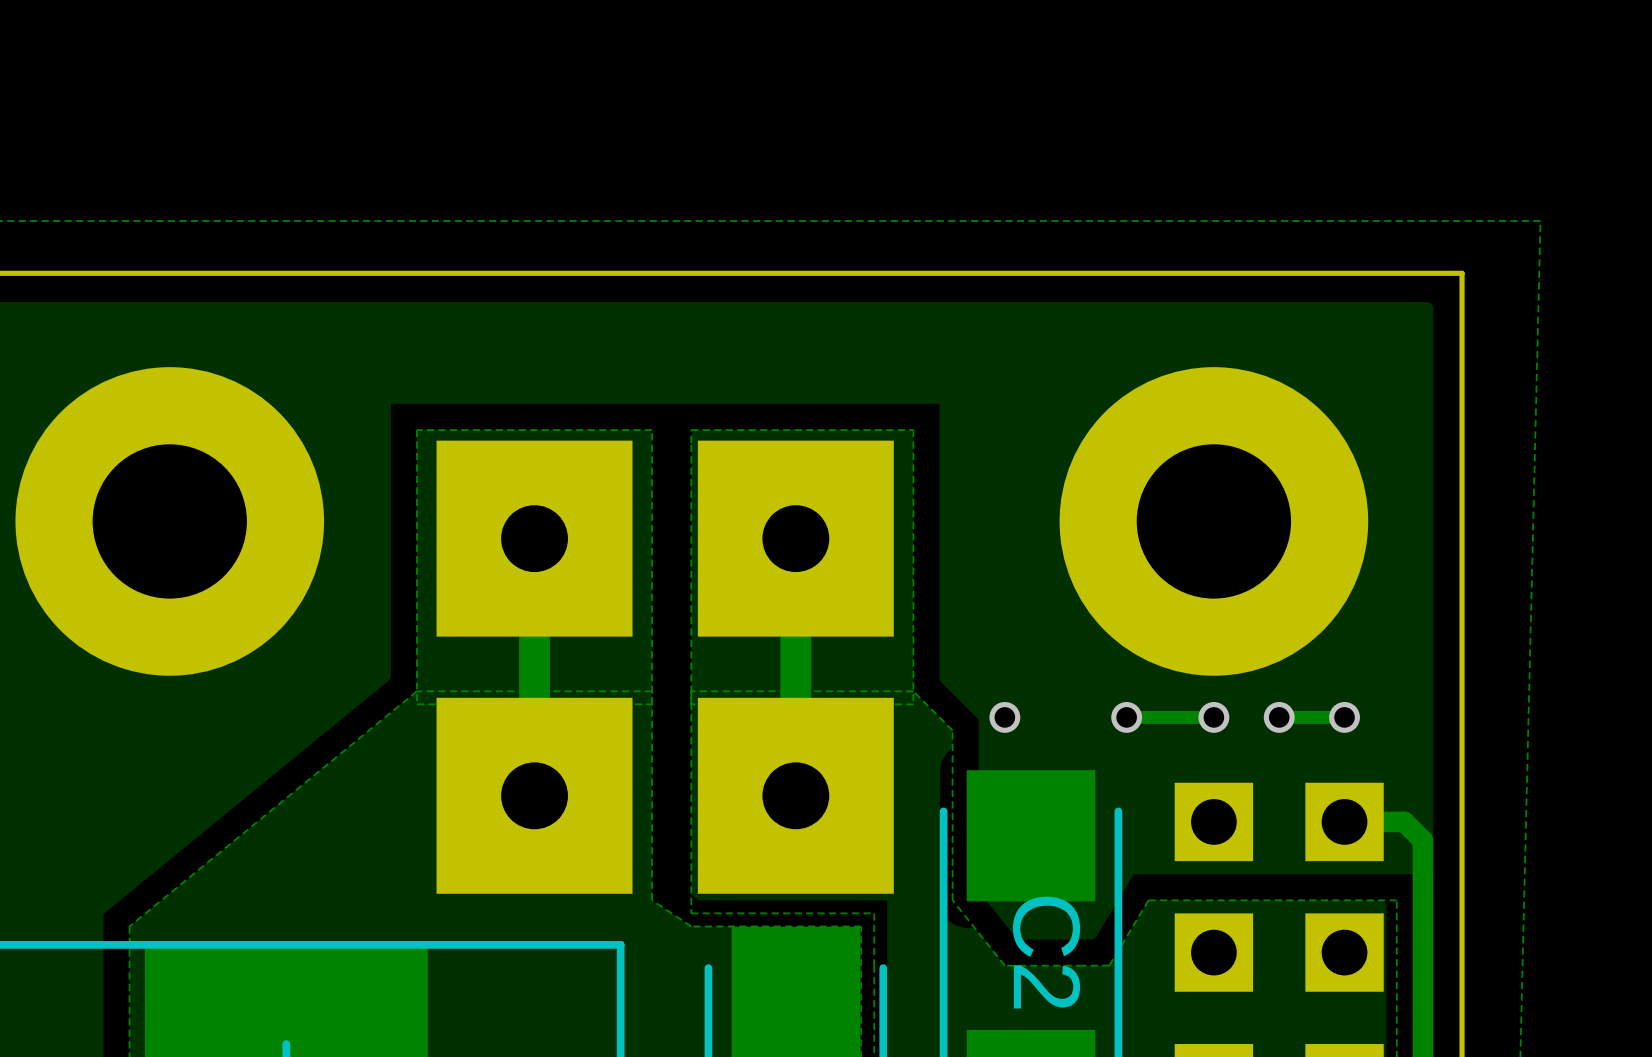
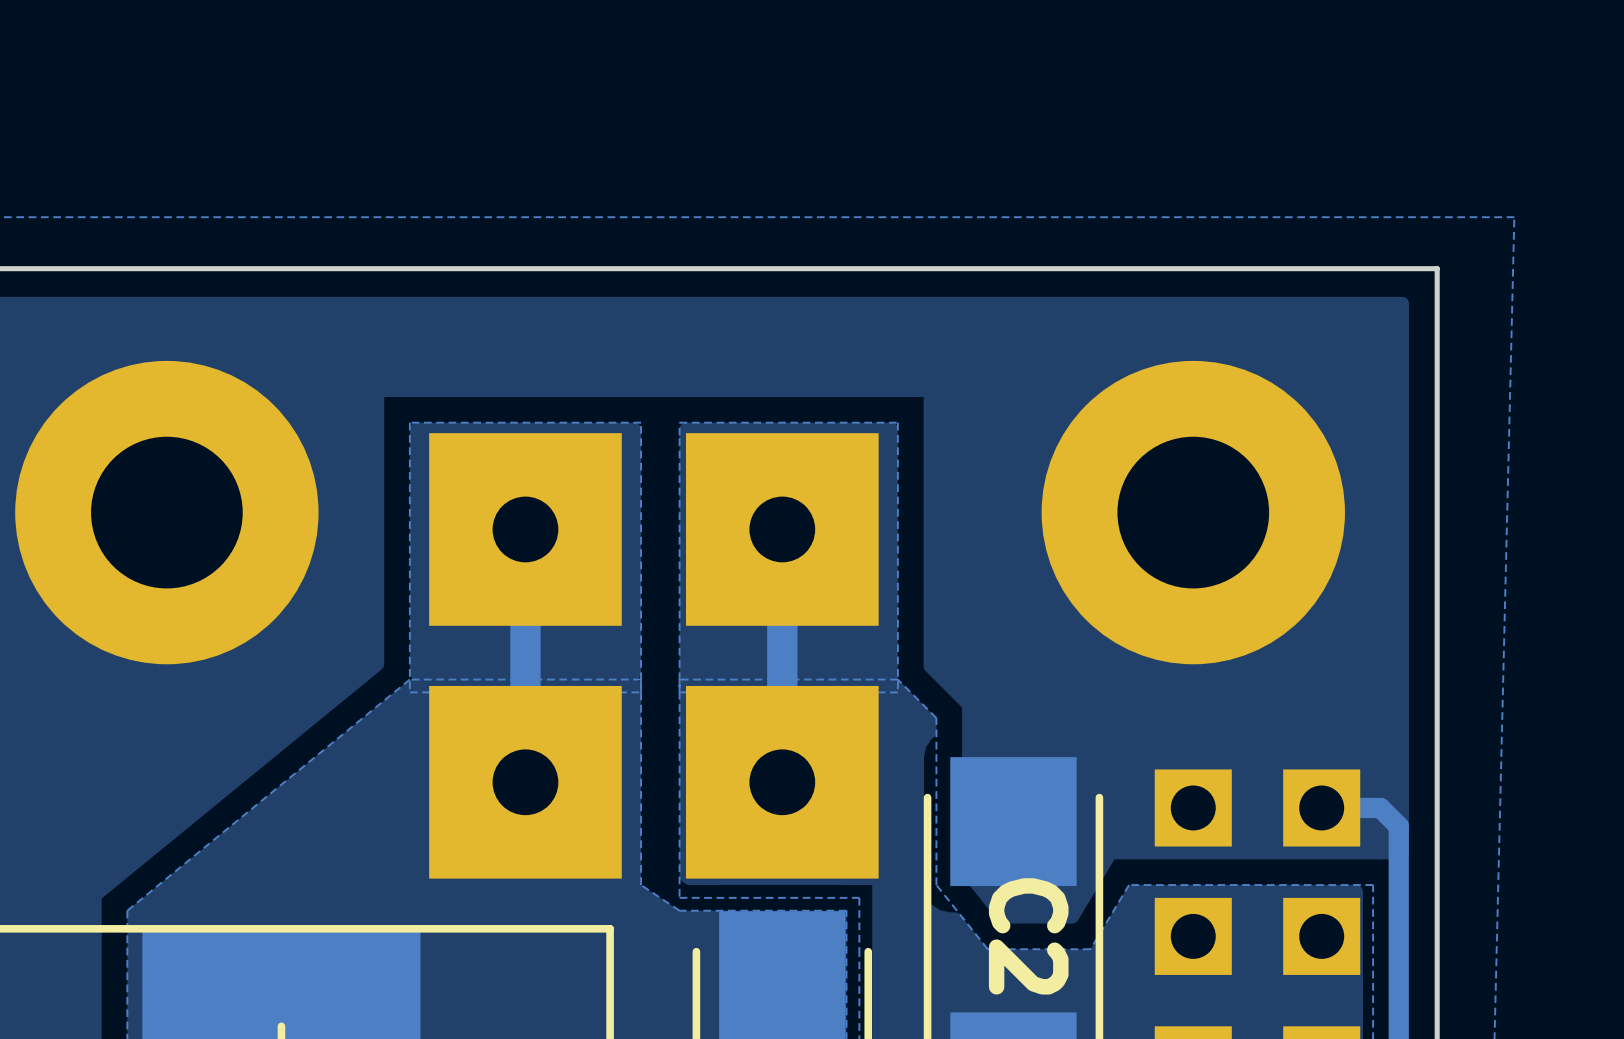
via: (1004, 717) -> none
via: (1126, 717) -> none
track: (1213, 717) (1126, 717) -> none
via: (1213, 717) -> none
via: (1279, 717) -> none
track: (1344, 717) (1279, 717) -> none
via: (1344, 717) -> none

